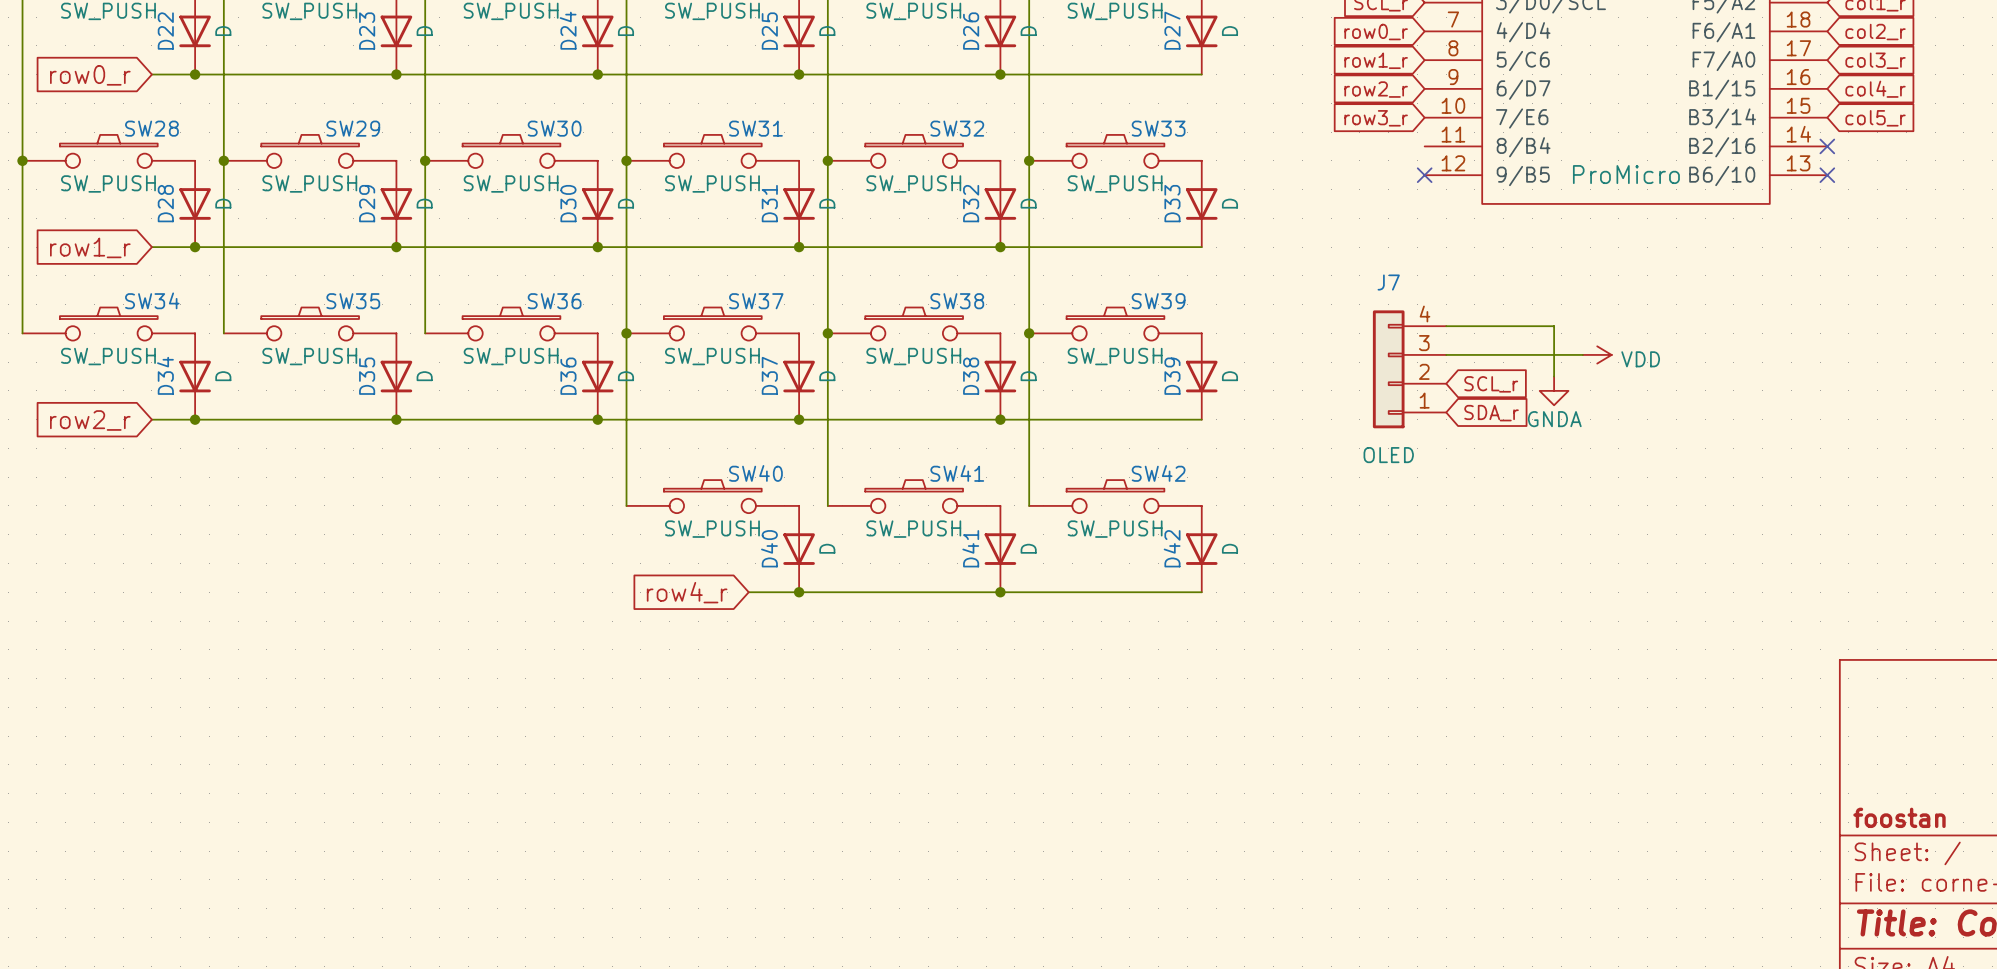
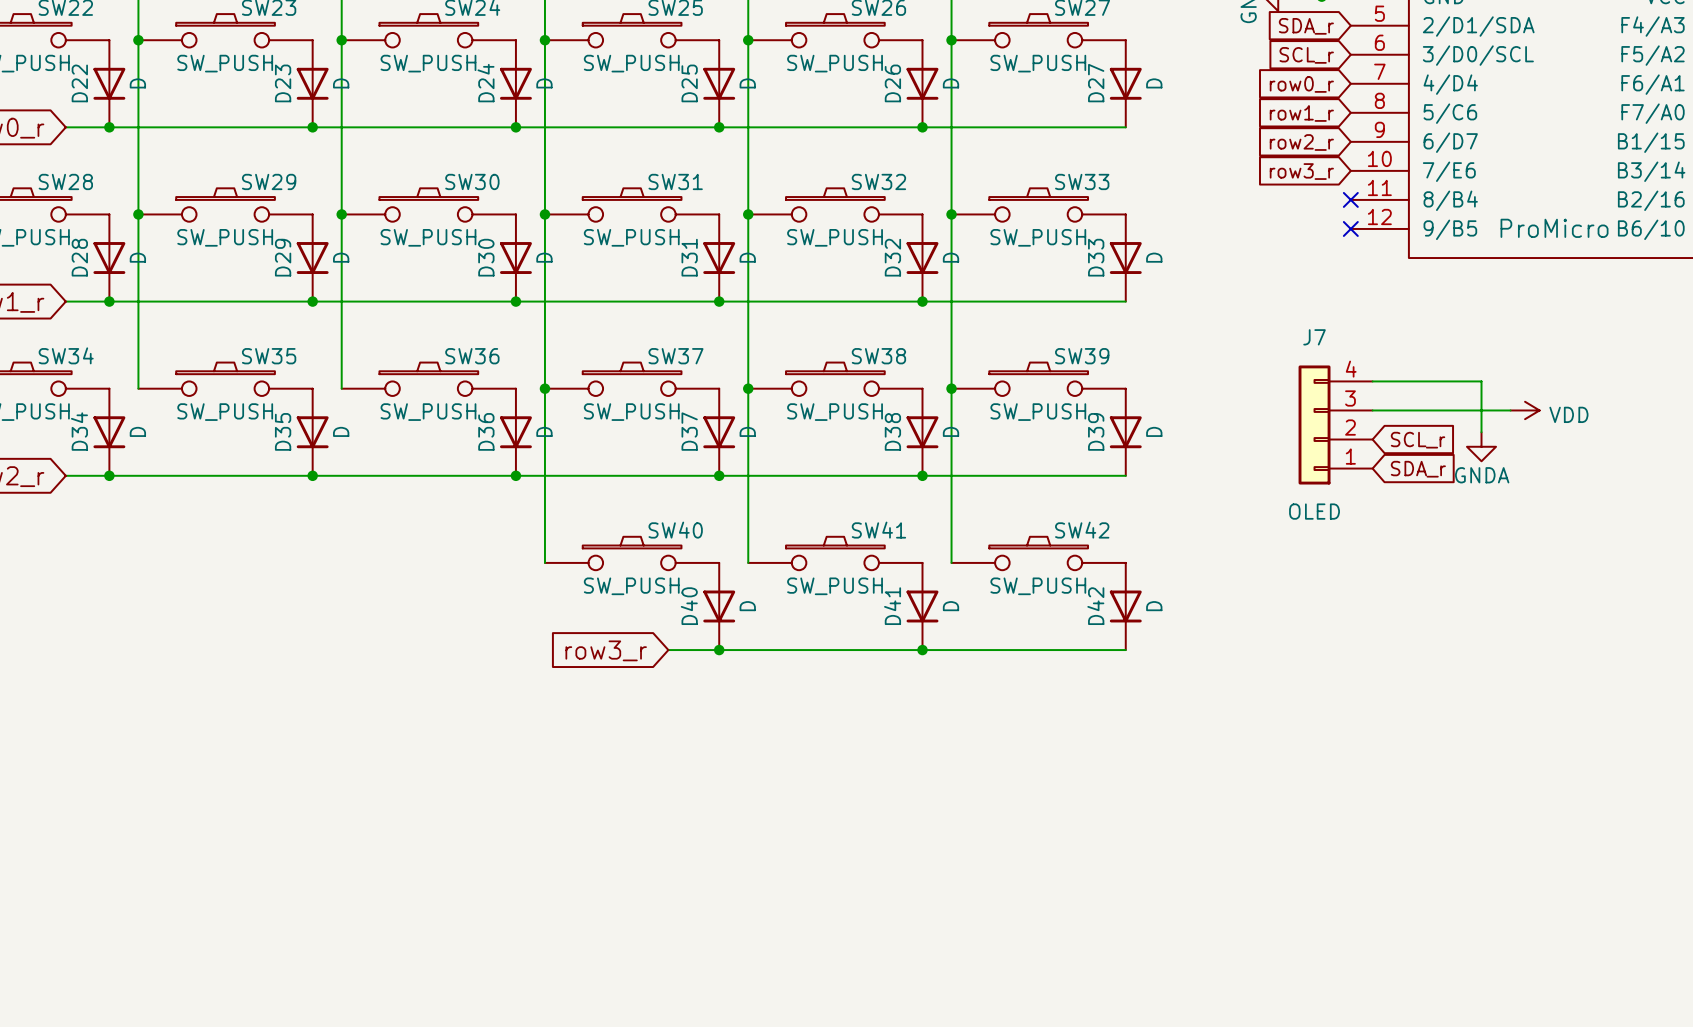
no-connect mark: none -> (1350, 199)
global label: row4_r (687, 592) -> row3_r (606, 650)

